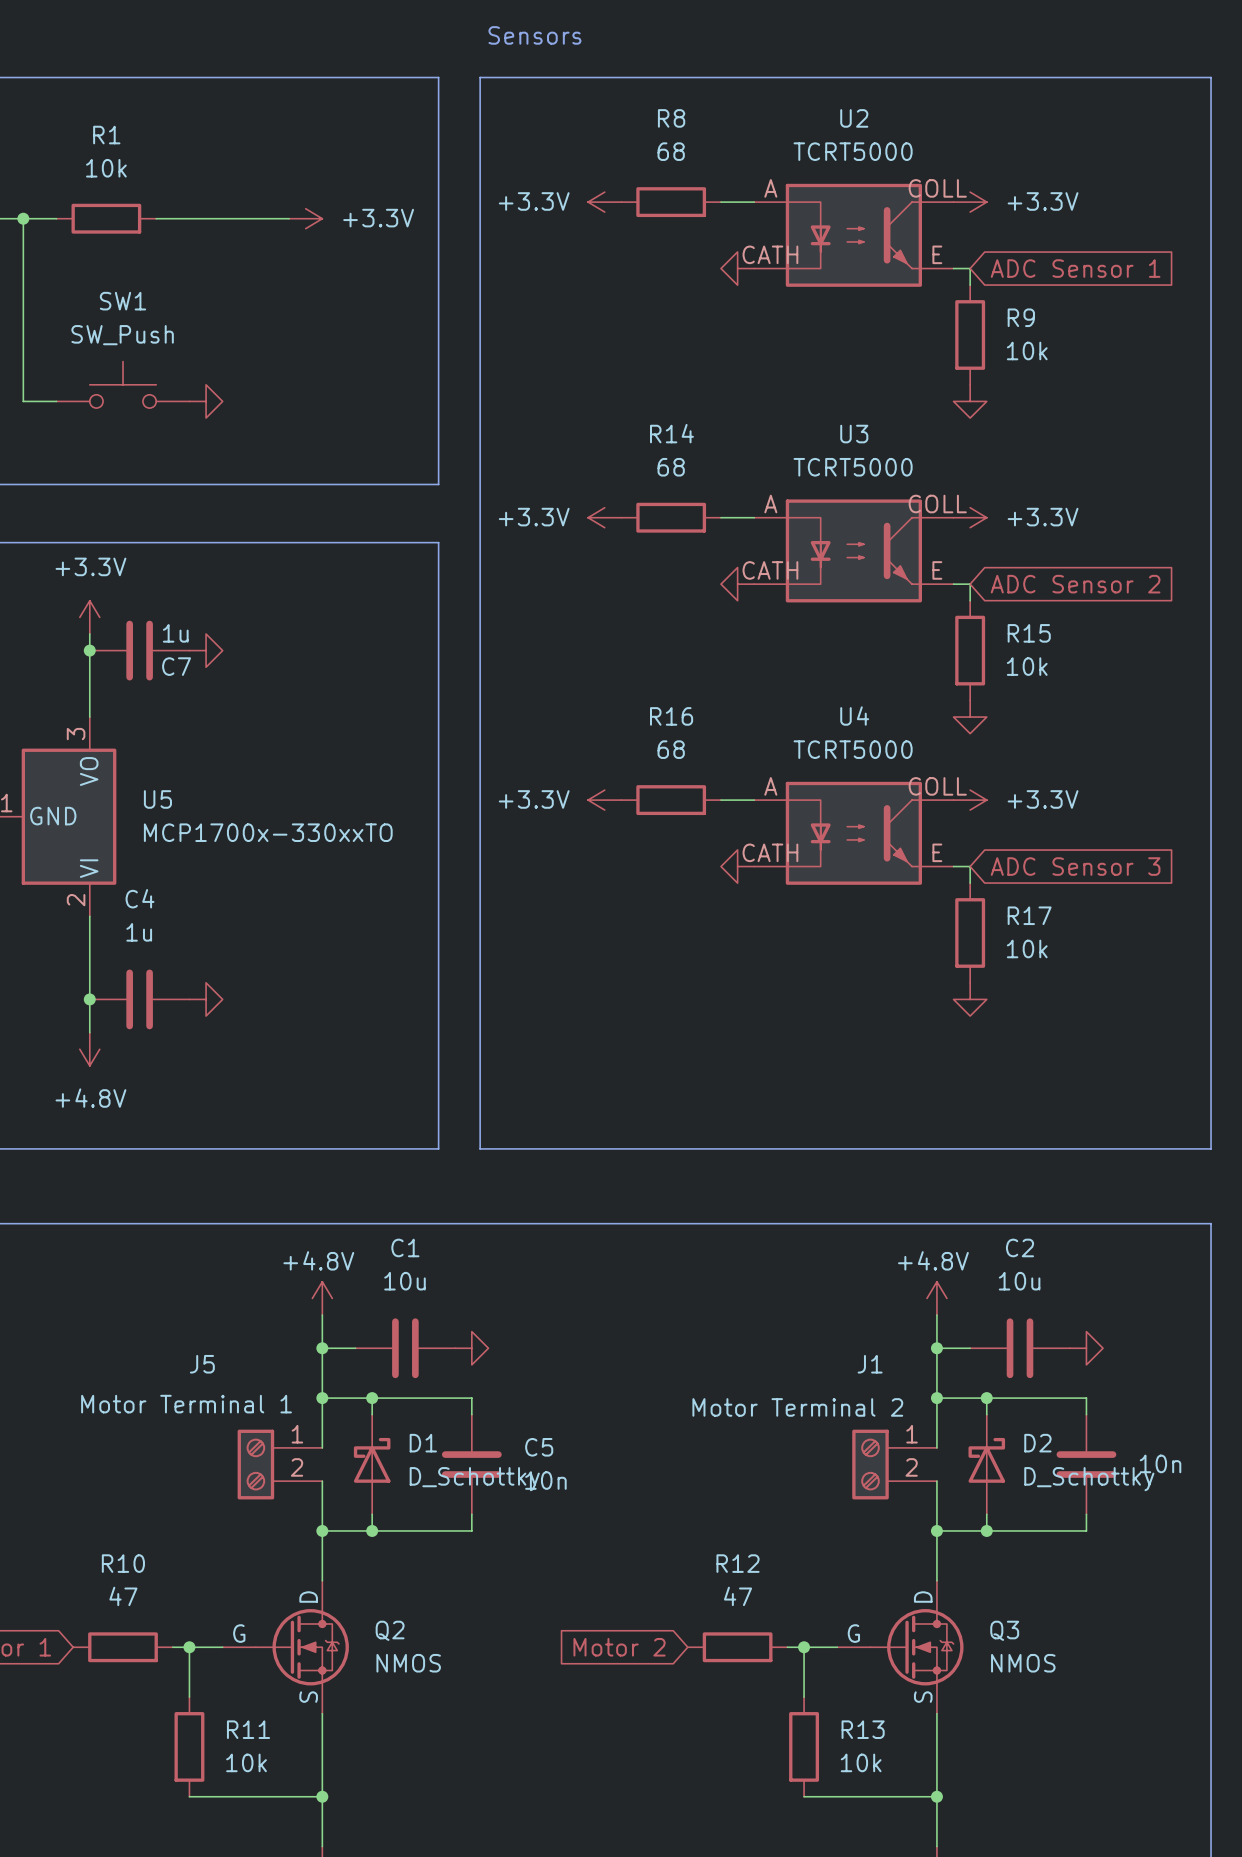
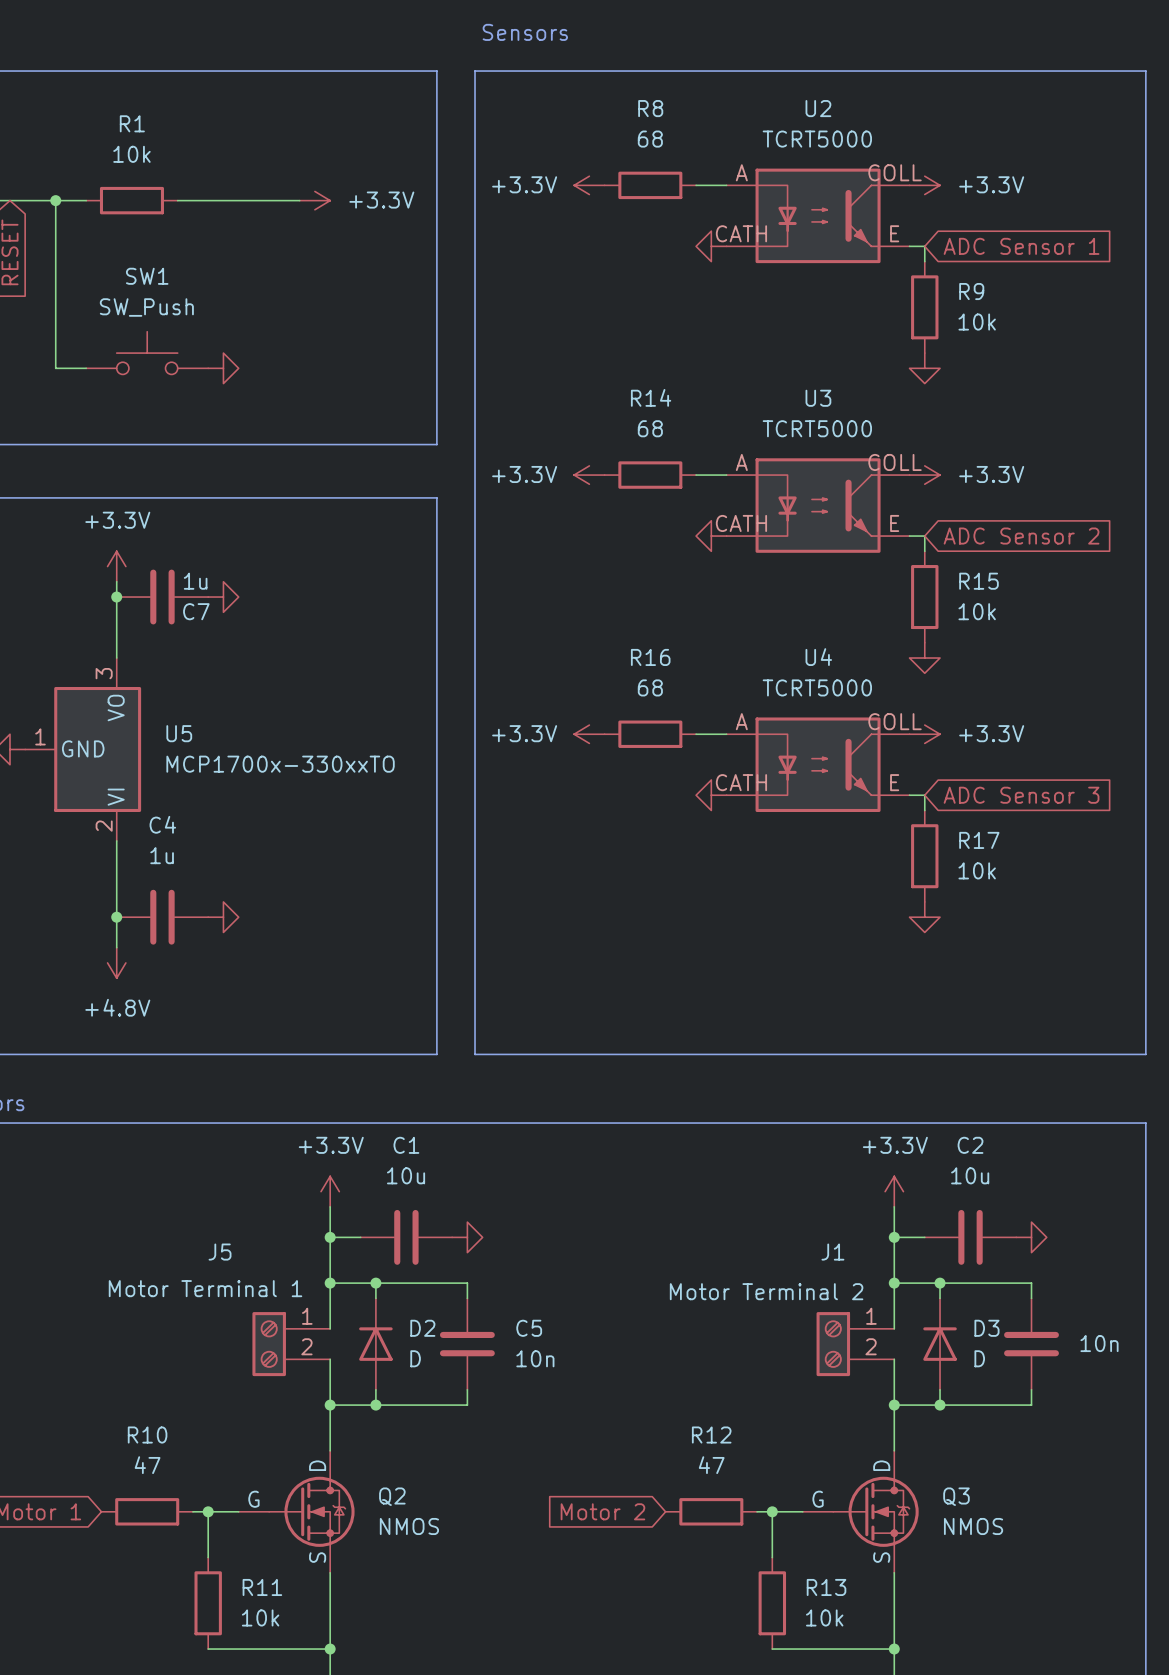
power symbol: +4.8V (322, 1298) -> +3.3V (330, 1191)
power symbol: +4.8V (936, 1298) -> +3.3V (894, 1191)
D2 symbol: [968, 1414, 1006, 1515] -> [359, 1298, 393, 1390]
D1: D_Schottky (372, 1464) -> none
D3: none -> D (940, 1344)
D2 value: D_Schottky (1089, 1479) -> D (415, 1358)

